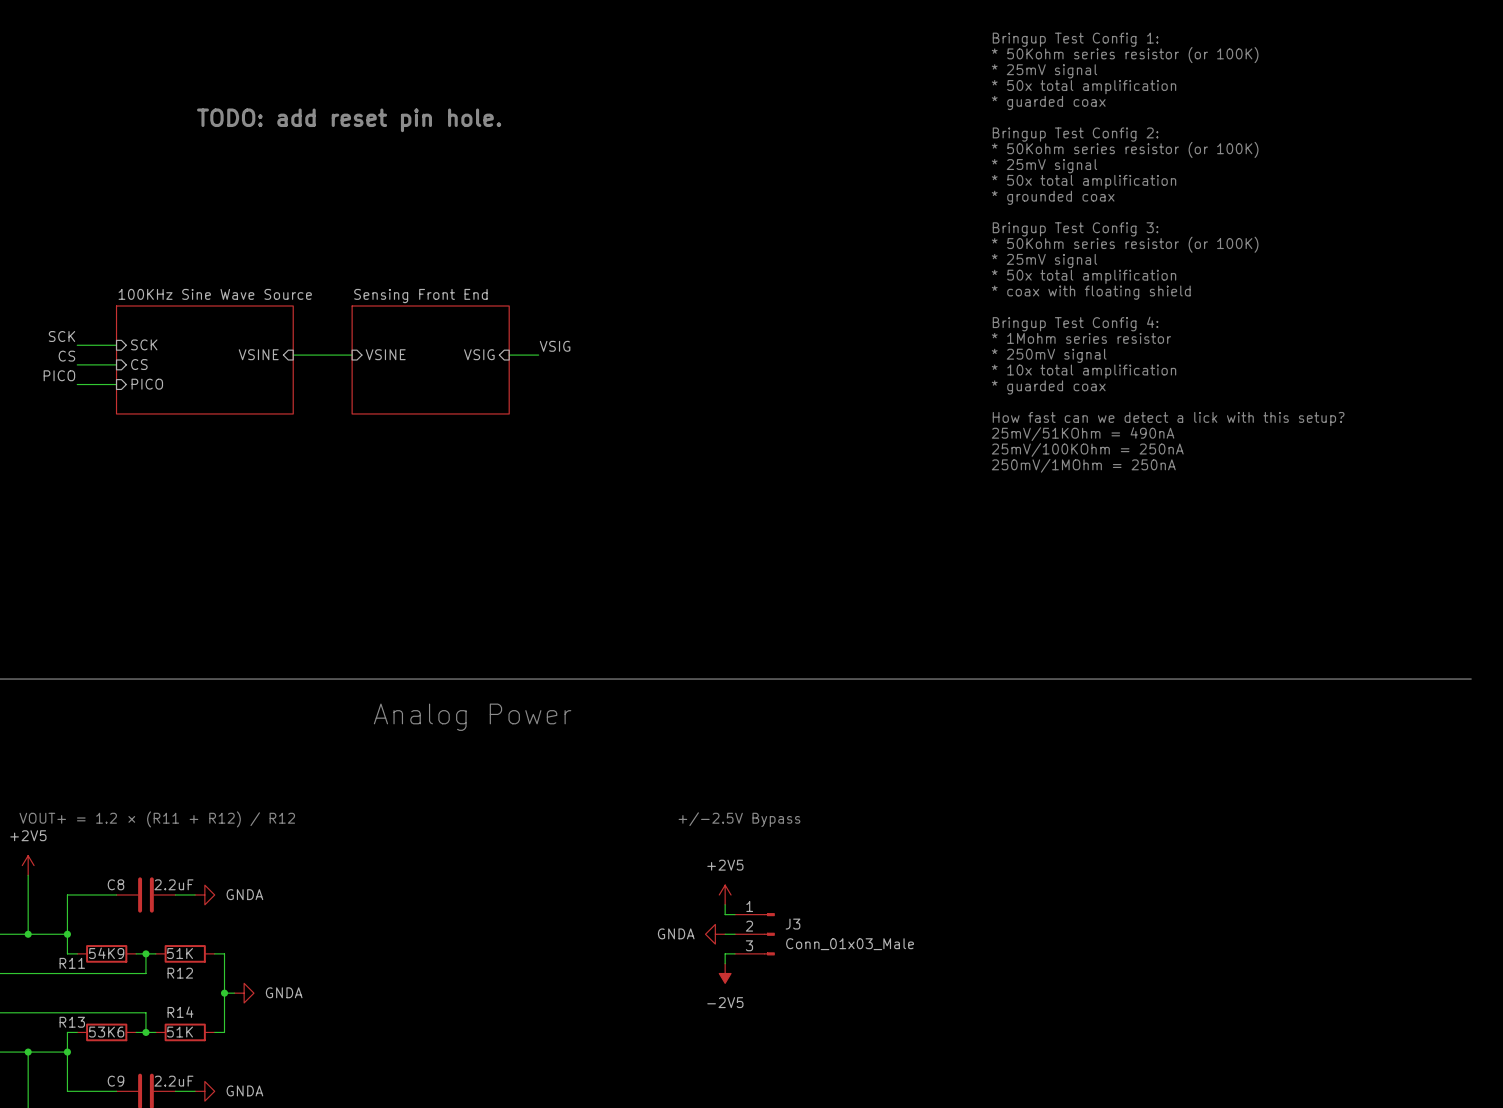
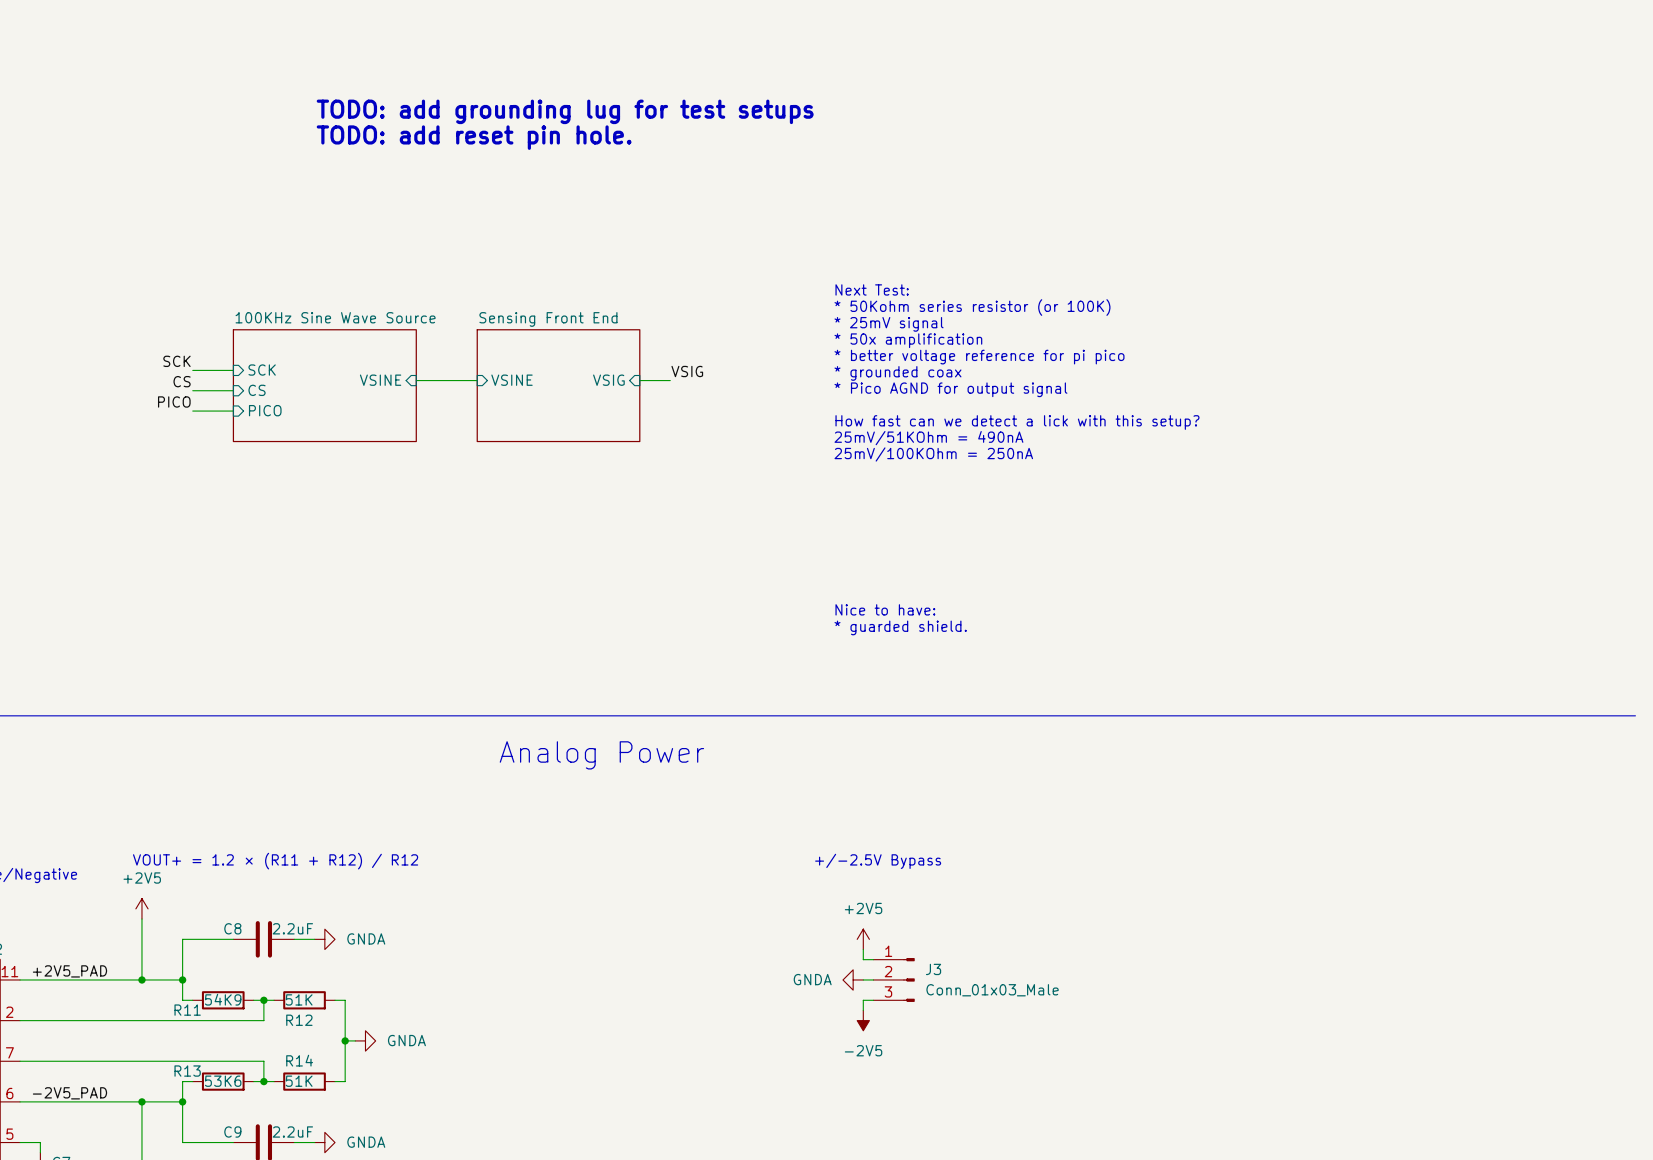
text: Bringup Test Config 1: (1075, 39) -> none
text: * 50Kohm series resistor (or 100K) (1125, 55) -> none
text: * 25mV signal (1044, 71) -> none
text: * 50x total amplification (1084, 87) -> none
text: none -> TODO: add grounding lug for test setups (565, 111)
text: * guarded coax (1048, 102) -> none
text: Bringup Test Config 2: (1075, 134) -> none
text: * 50Kohm series resistor (or 100K) (1125, 149) -> none
text: * 25mV signal (1044, 166) -> none
text: * 50x total amplification (1084, 181) -> none
text: * grounded coax (1053, 197) -> none
text: Bringup Test Config 3: (1075, 229) -> none
text: * 50Kohm series resistor (or 100K) (1125, 244) -> none
text: * 25mV signal (1044, 261) -> none
text: none -> Next Test: (872, 289)
text: * 50x total amplification (1084, 276) -> none
text: none -> * 50Kohm series resistor (or 100K) (972, 307)
text: * coax with floating shield (1091, 292) -> none
text: none -> * 25mV signal (889, 324)
text: none -> * 50x amplification (908, 340)
text: Bringup Test Config 4: (1075, 323) -> none
text: none -> * better voltage reference for pi pico (979, 357)
text: * 1Mohm series resistor (1081, 338) -> none
text: none -> * grounded coax (897, 373)
text: * 250mV signal (1049, 355) -> none
text: none -> * Pico AGND for output signal (950, 389)
text: * 10x total amplification (1084, 371) -> none
text: * guarded coax (1048, 387) -> none
text: none -> How fast can we detect a lick with this setup? (1017, 422)
text: none -> 25mV/51KOhm = 490nA (928, 438)
text: How fast can we detect a lick with this setup? (1168, 419) -> none
text: none -> 25mV/100KOhm = 250nA (933, 454)
text: 25mV/51KOhm = 490nA (1083, 434) -> none
text: 25mV/100KOhm = 250nA (1087, 449) -> none
text: 250mV/1MOhm = 250nA (1083, 465) -> none
text: none -> Nice to have: (885, 609)
text: none -> * guarded shield. (900, 627)

